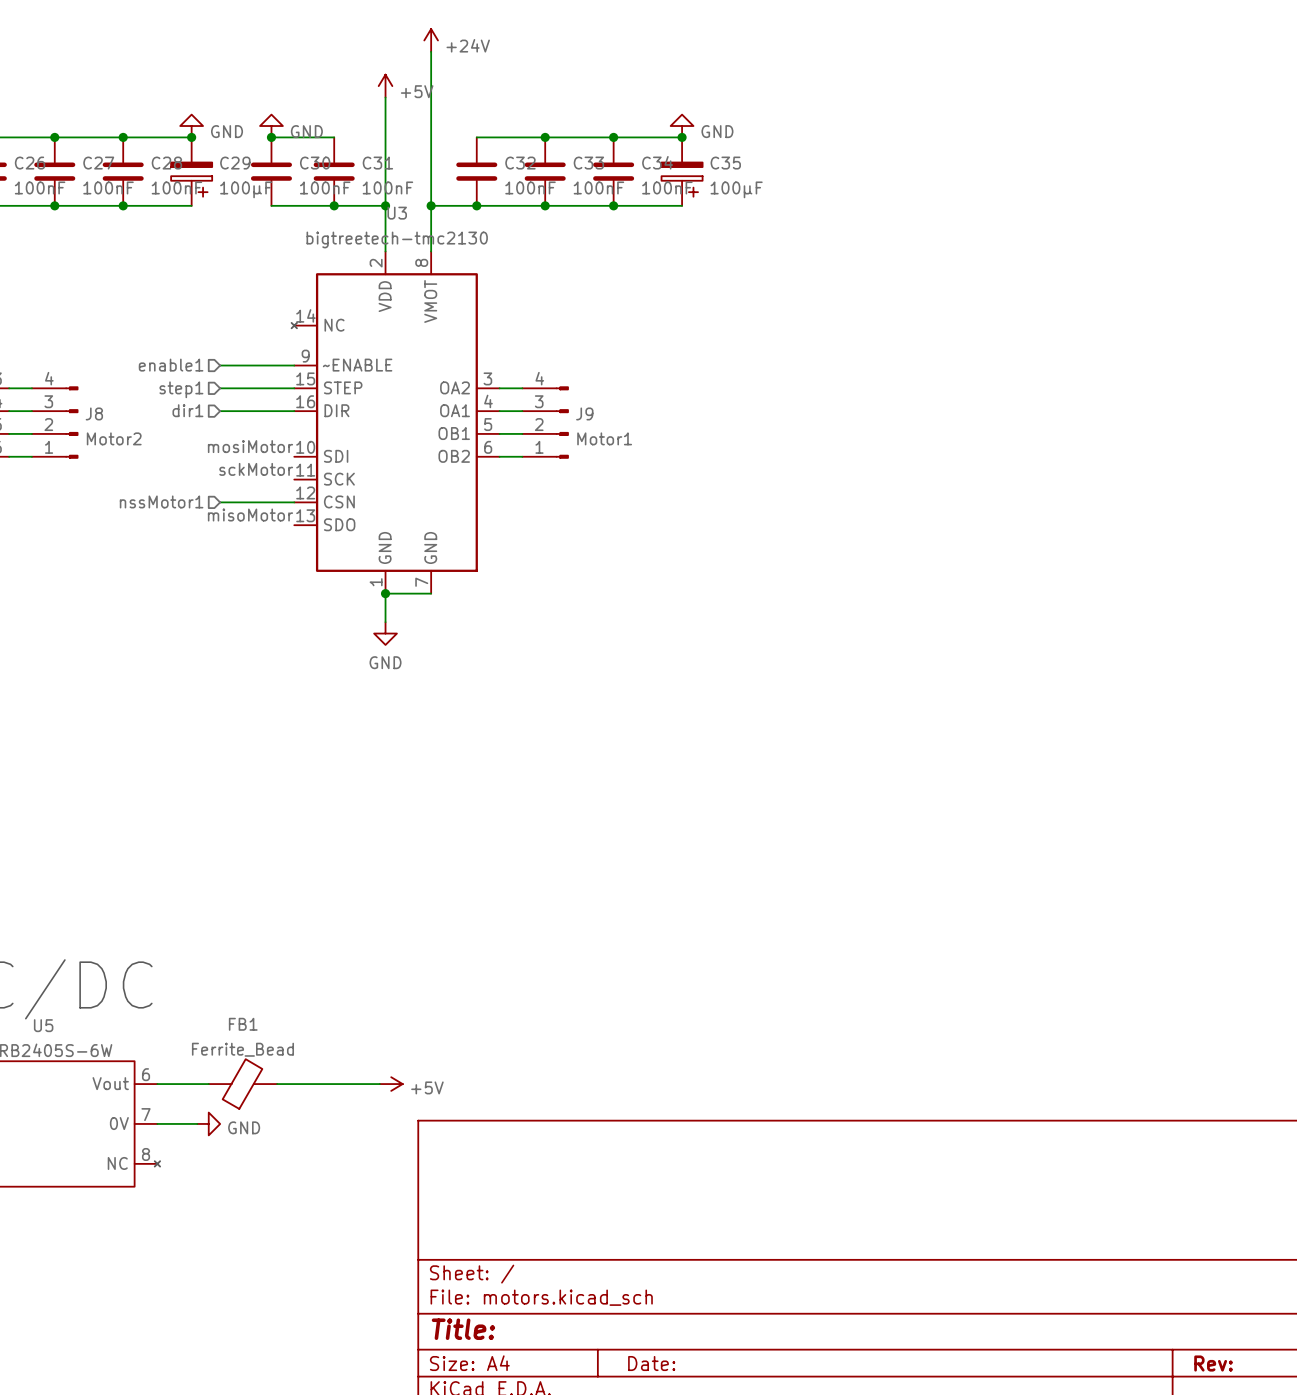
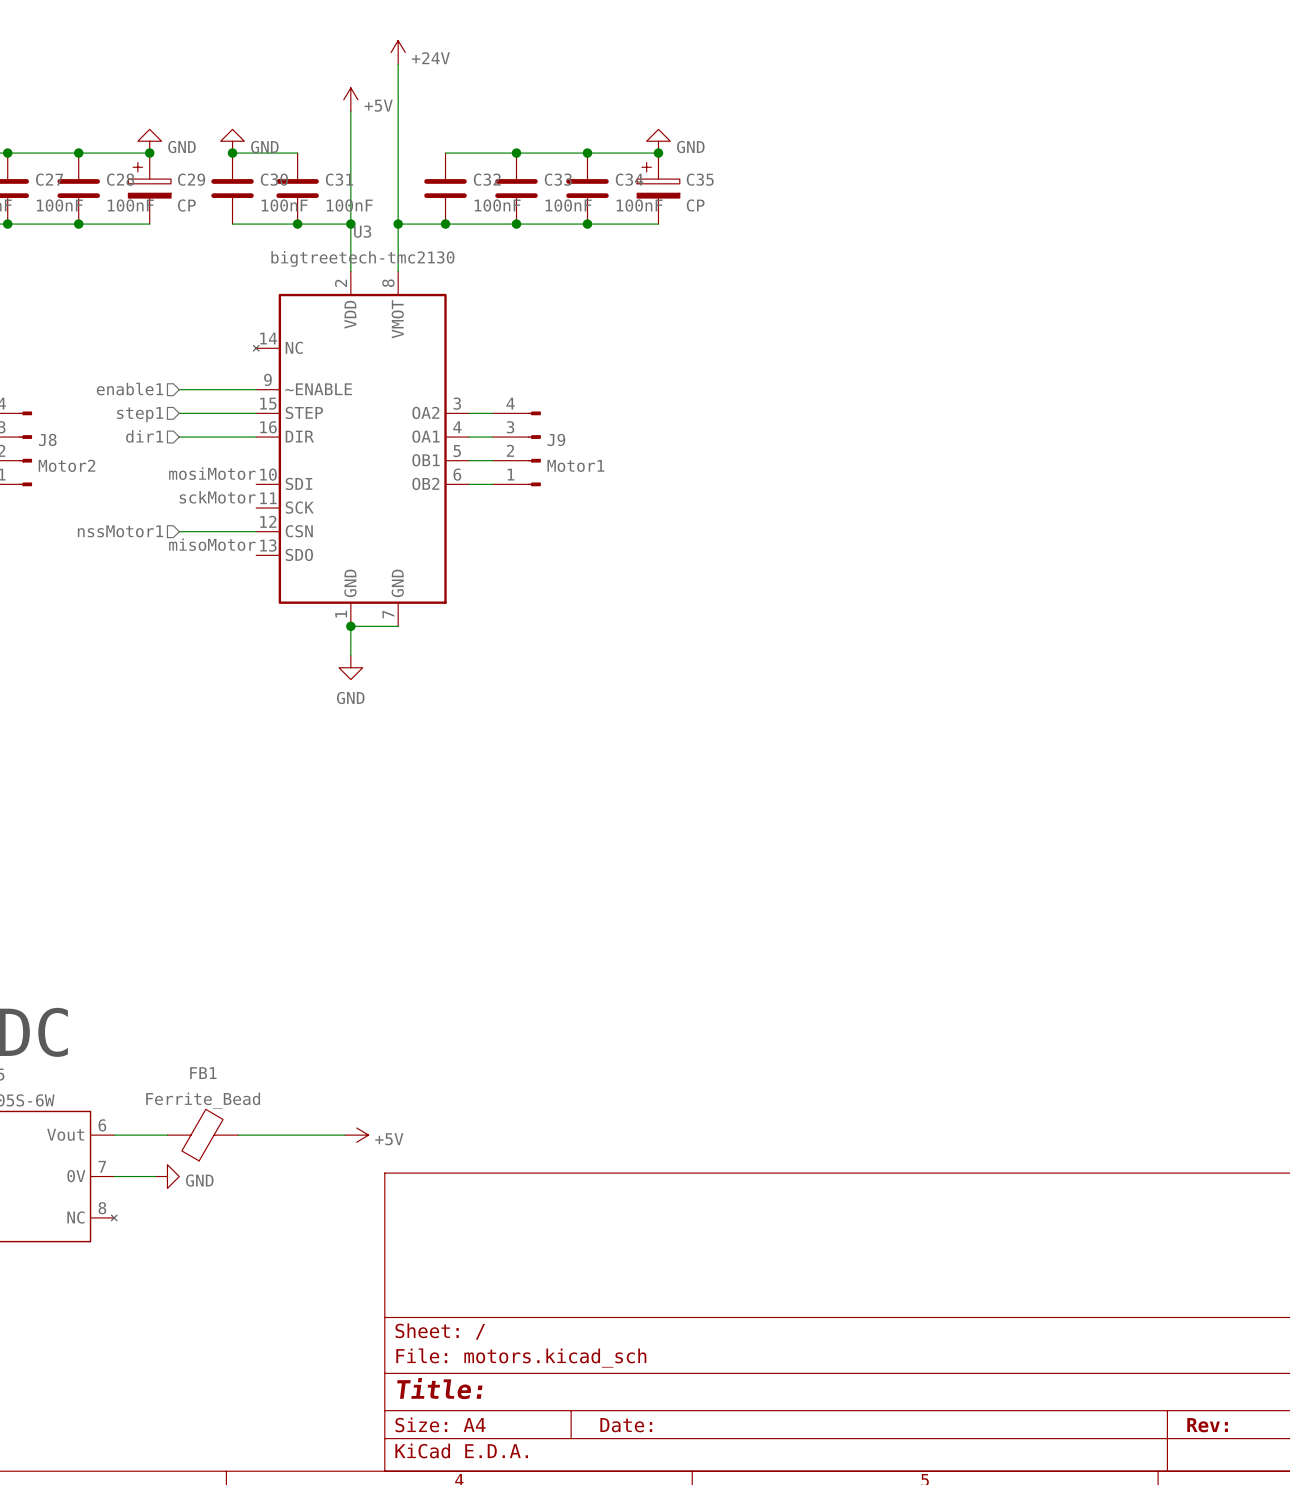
C29 rotation: 0° (191, 179) -> 180° (149, 180)
C35 rotation: 0° (682, 179) -> 180° (658, 180)
C29 value: 100µF (246, 189) -> CP (186, 205)
C35 value: 100µF (736, 189) -> CP (695, 205)

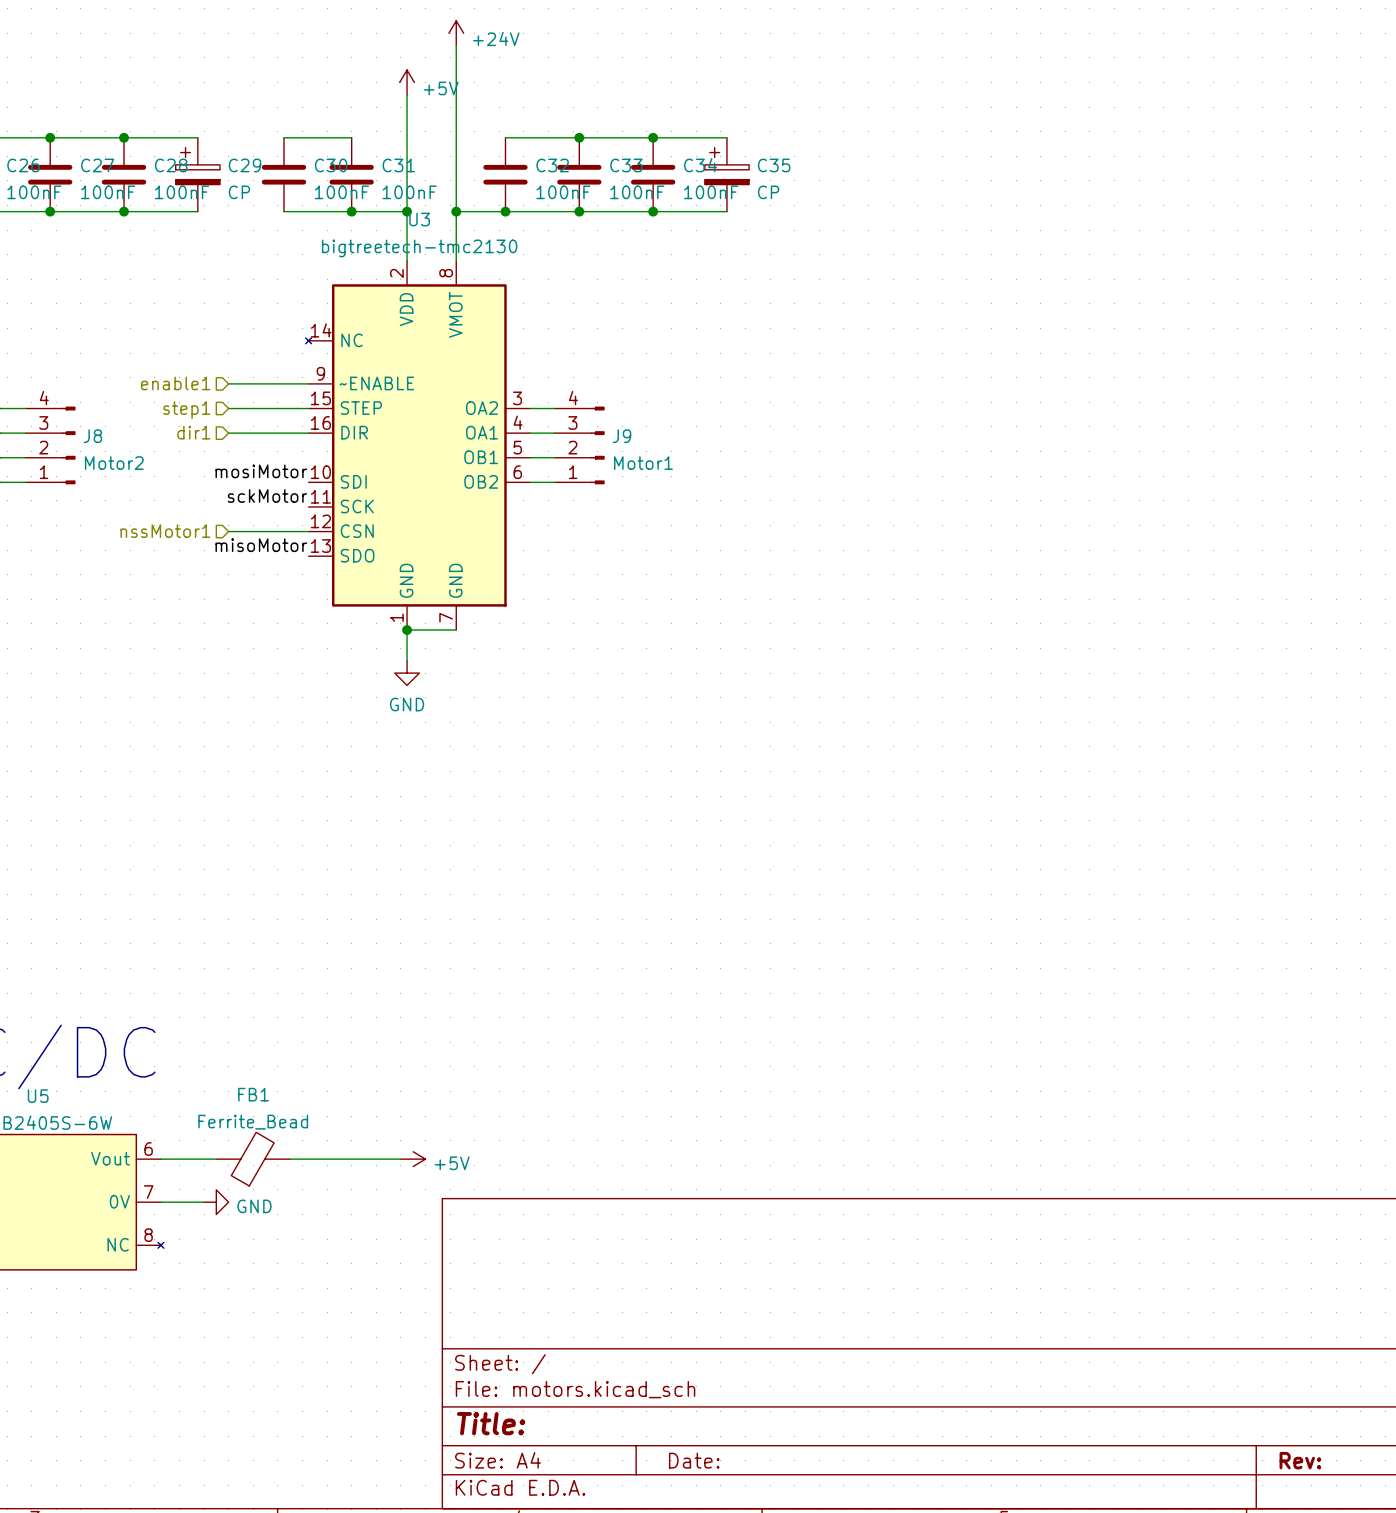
power symbol: GND (149, 141) -> none
power symbol: GND (232, 141) -> none
power symbol: GND (658, 141) -> none
junction: (149, 153) -> none
junction: (232, 153) -> none
junction: (658, 153) -> none

